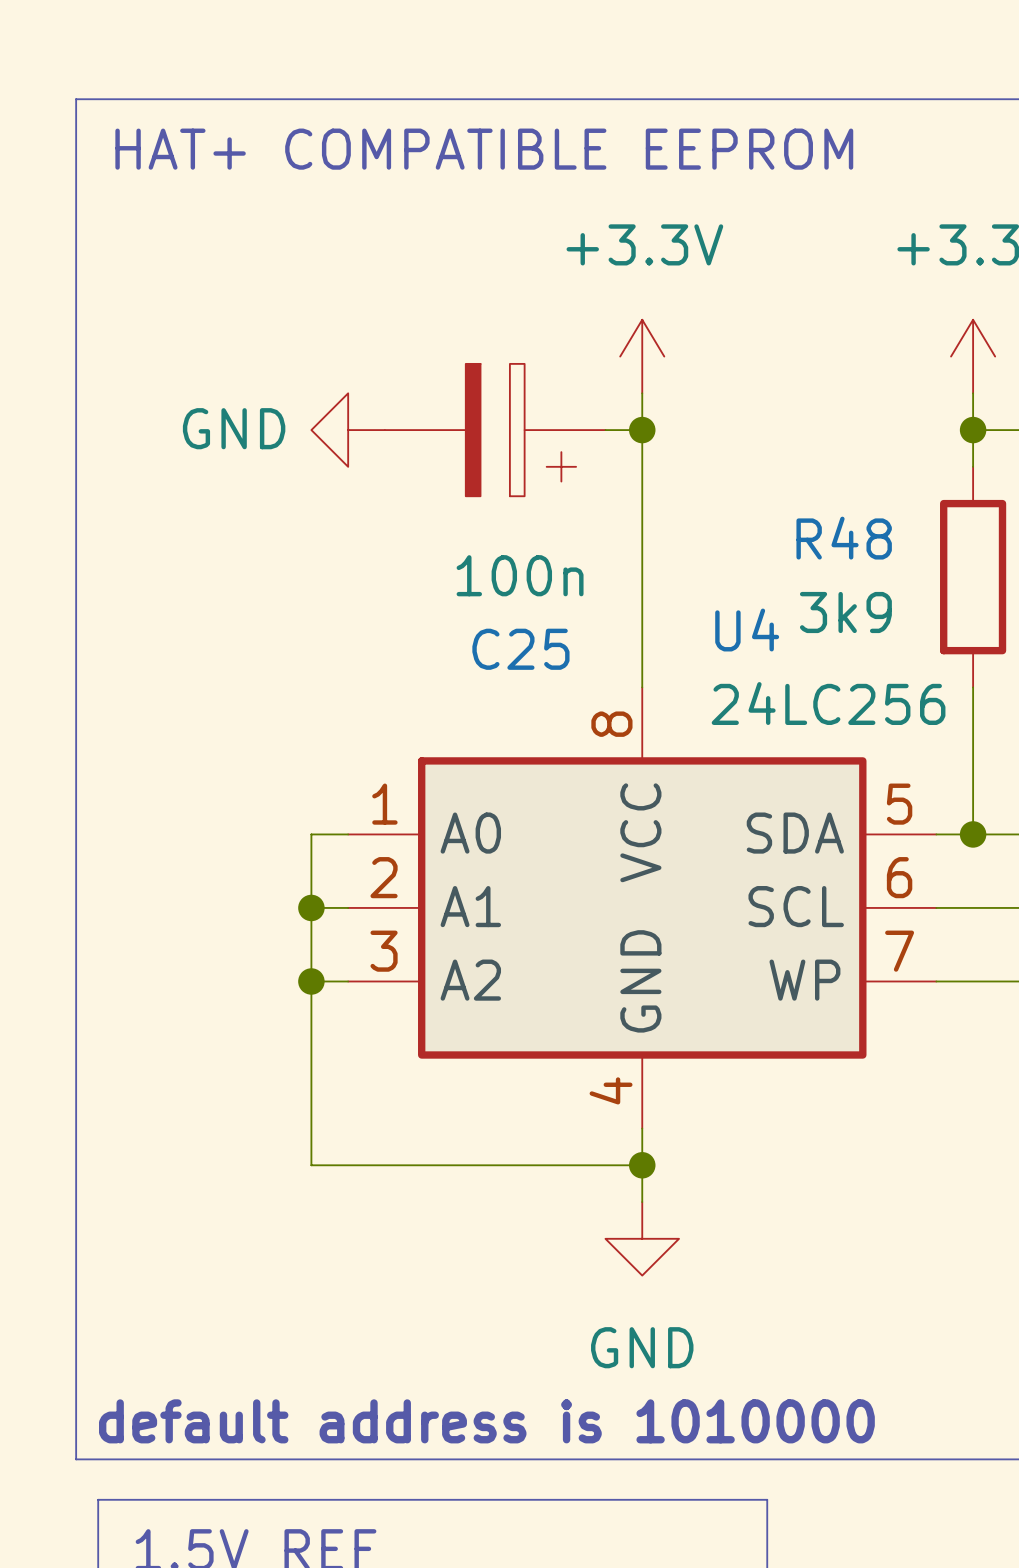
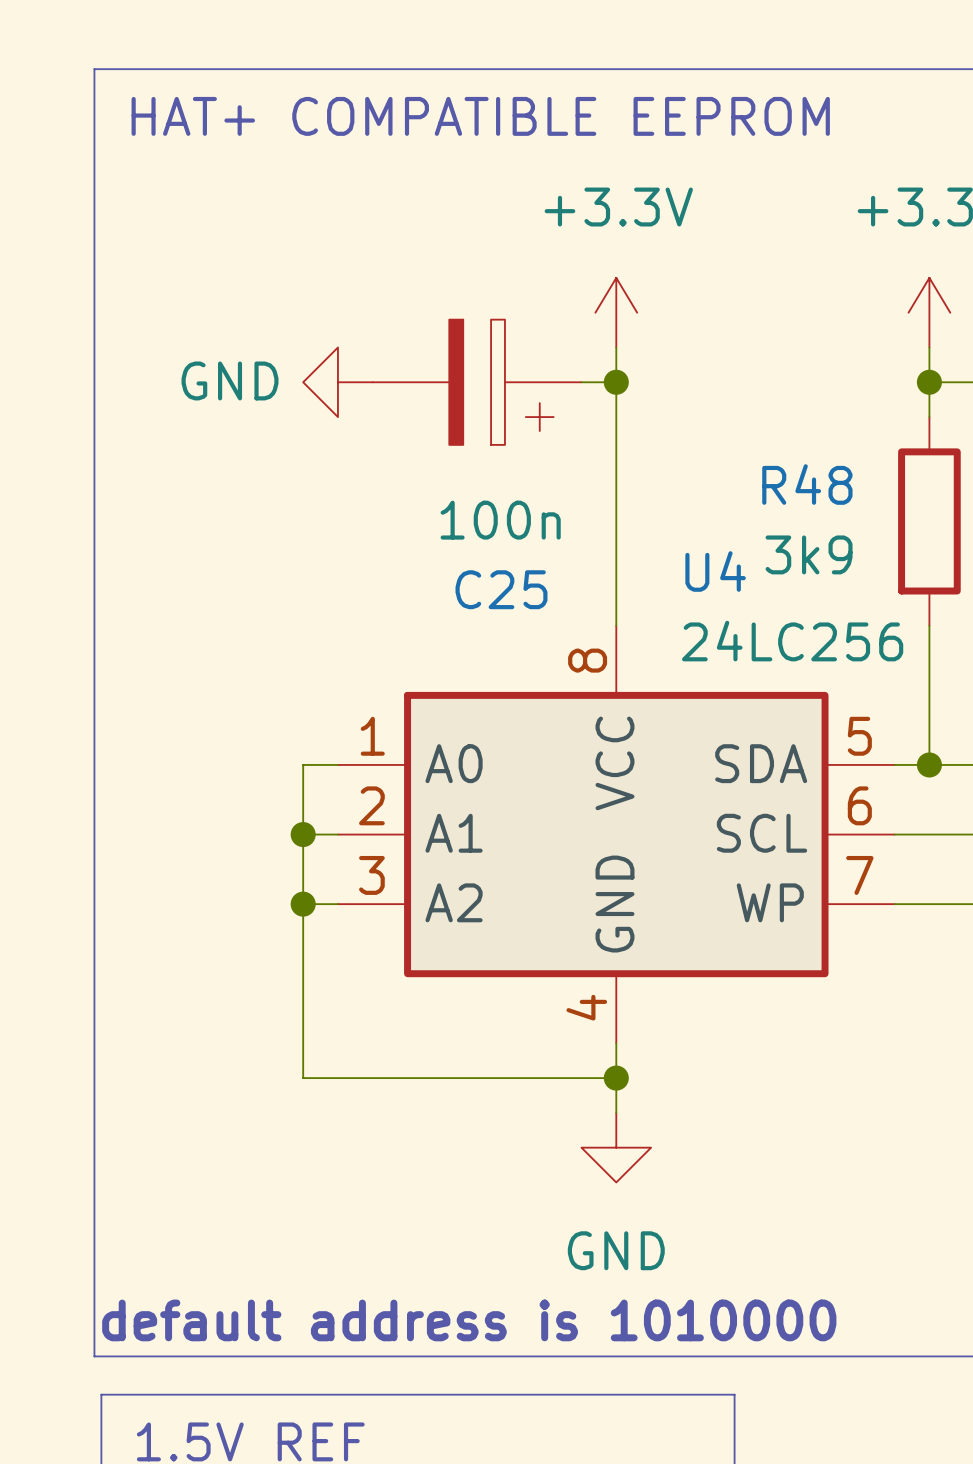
line: (90, 99) (76, 99) (76, 1459) (90, 1459) -> (94, 69) (94, 1356)
text position: HAT+ COMPATIBLE EEPROM (484, 149) -> HAT+ COMPATIBLE EEPROM (480, 116)

